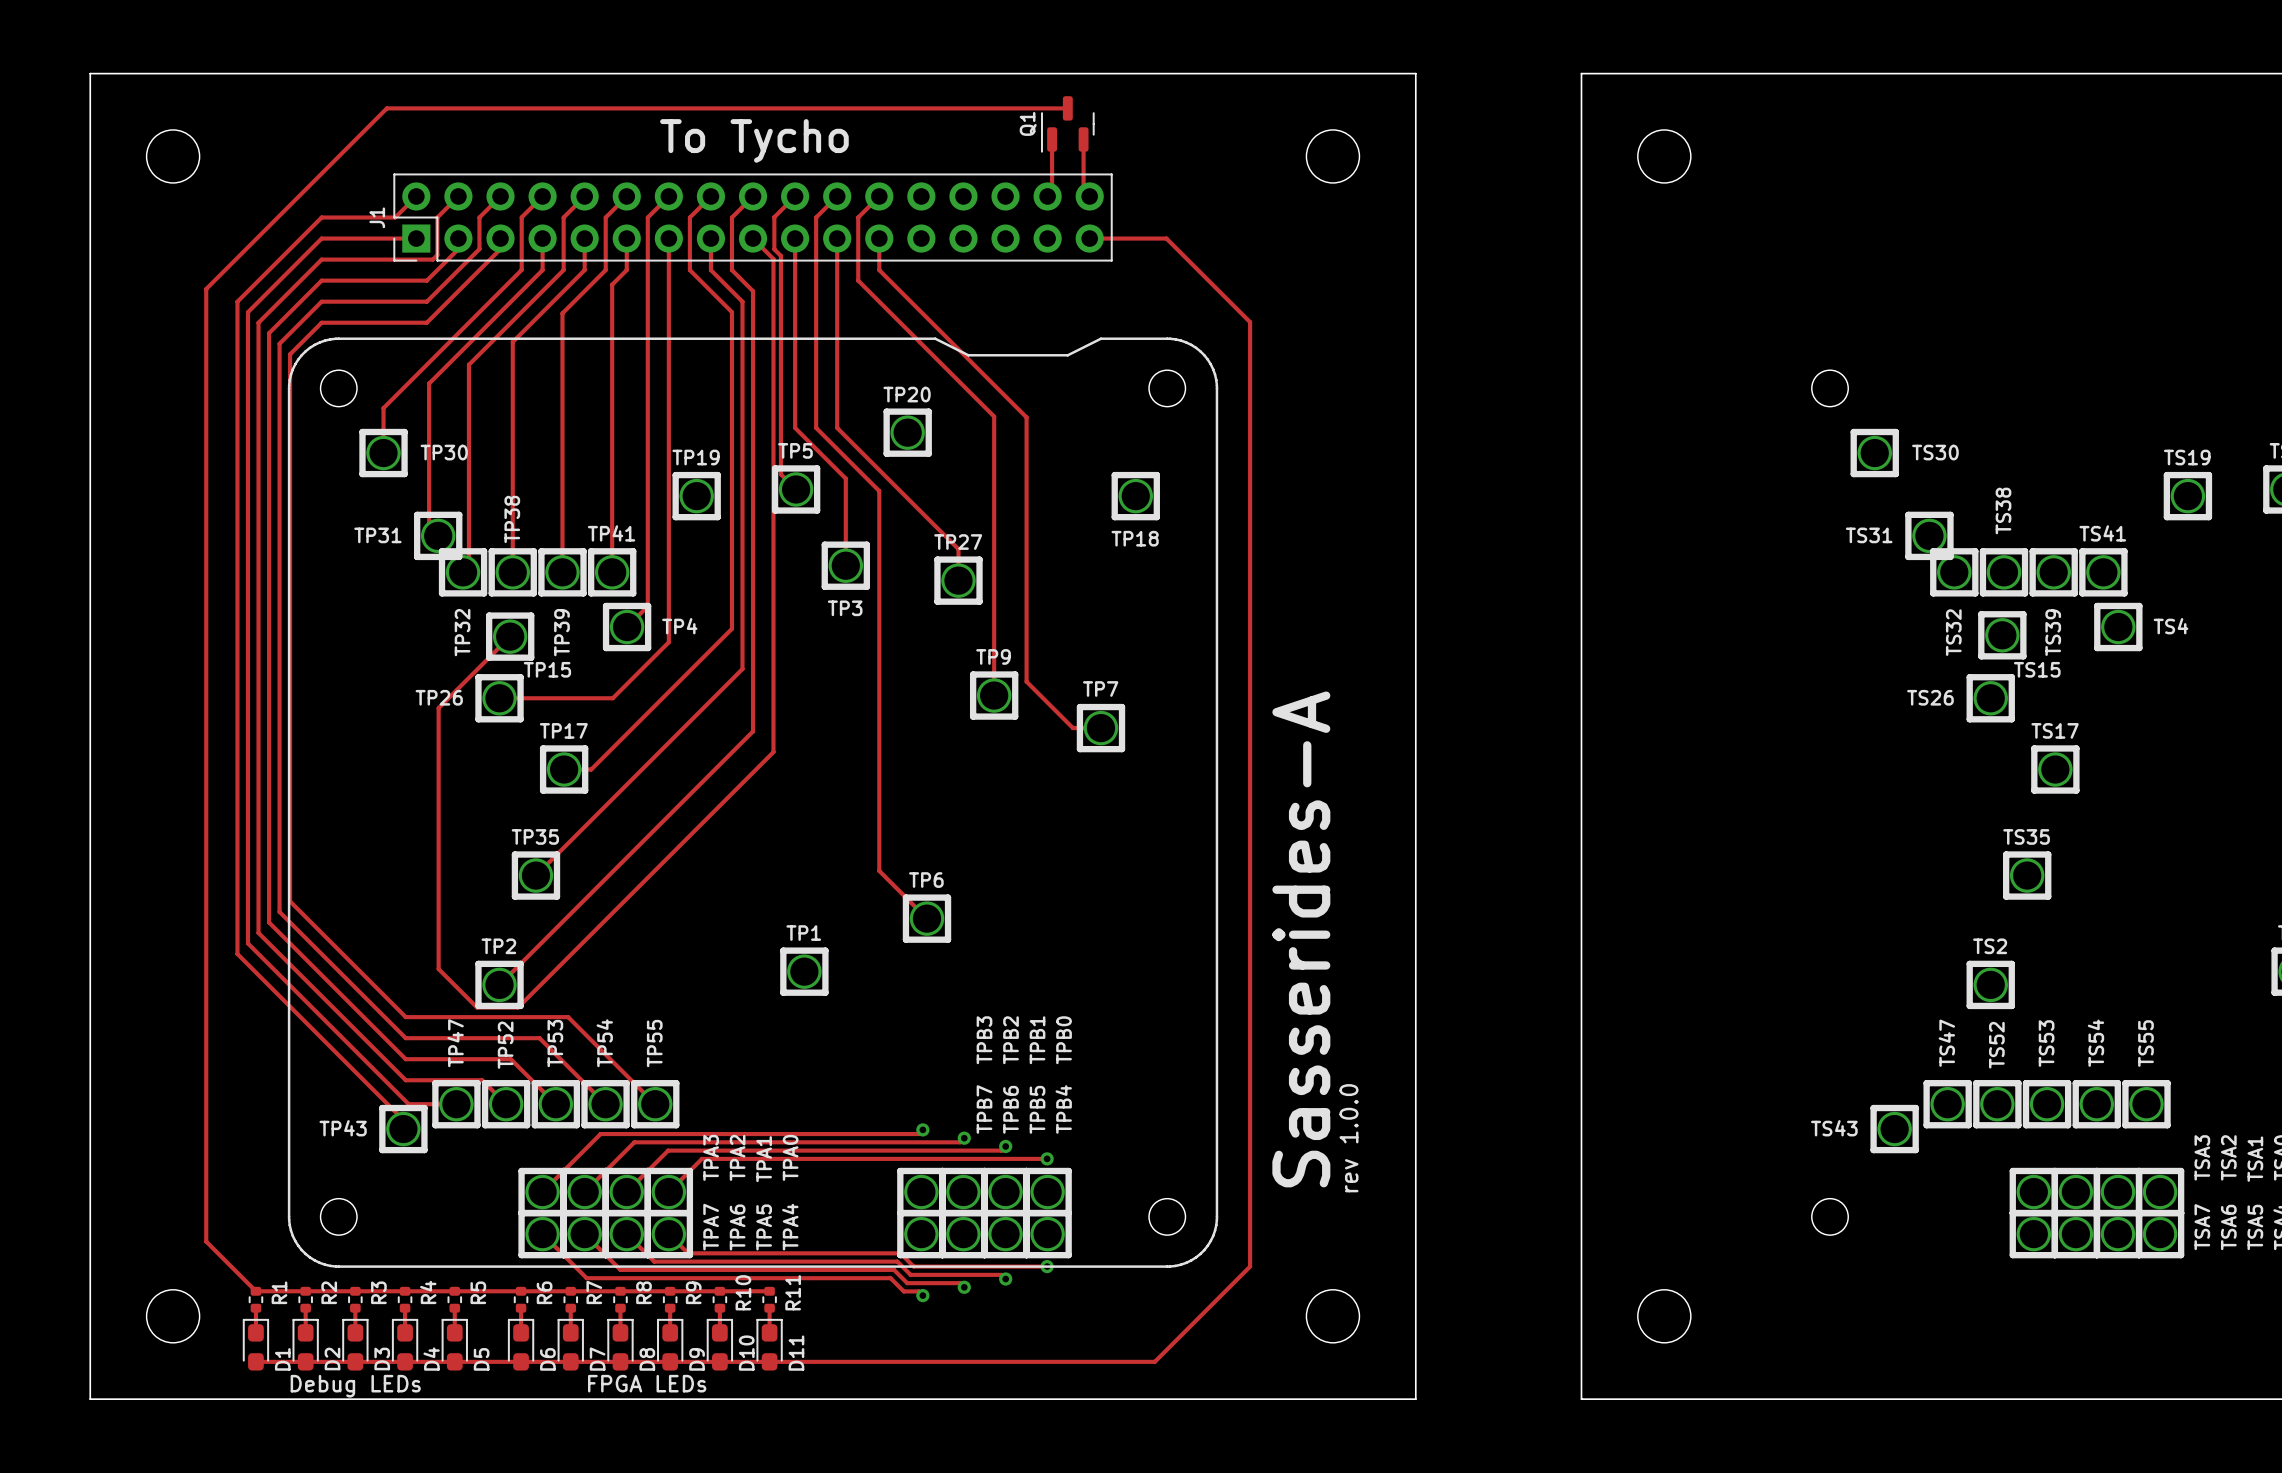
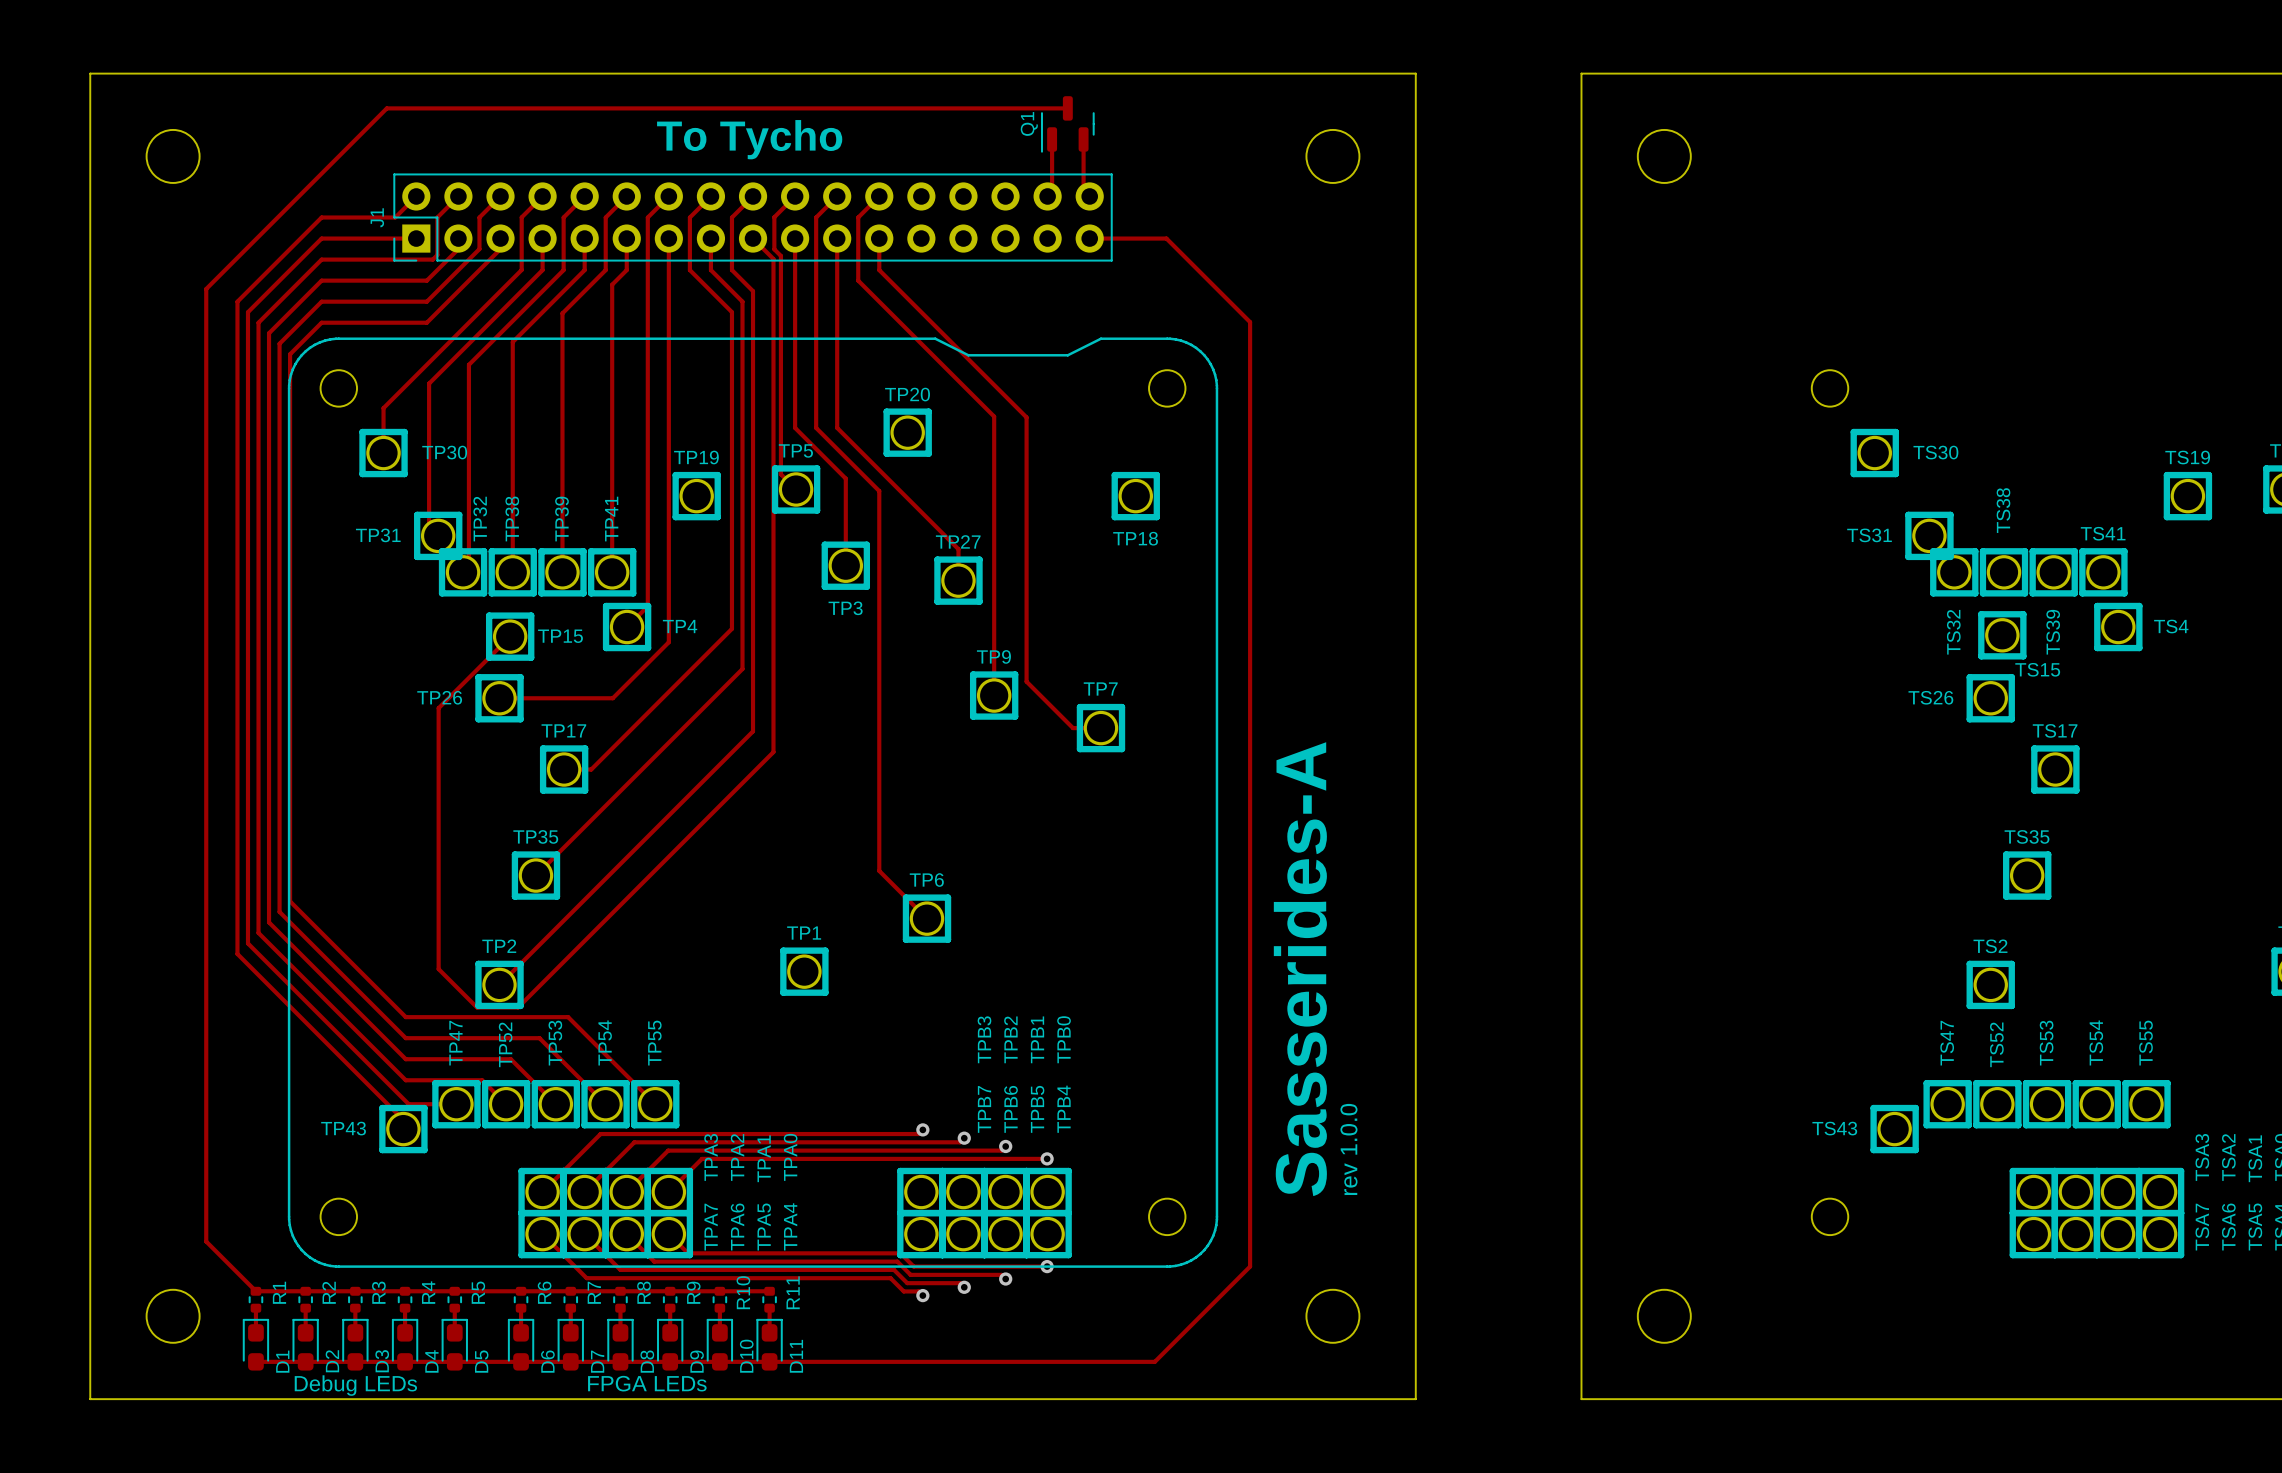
TP41 name rotation: 0° (611, 533) -> 90° counterclockwise (611, 519)
TP32 name position: TP32 (462, 632) -> TP32 (480, 519)
TP39 name position: TP39 (561, 632) -> TP39 (561, 519)
TP15 name position: TP15 (547, 669) -> TP15 (560, 636)

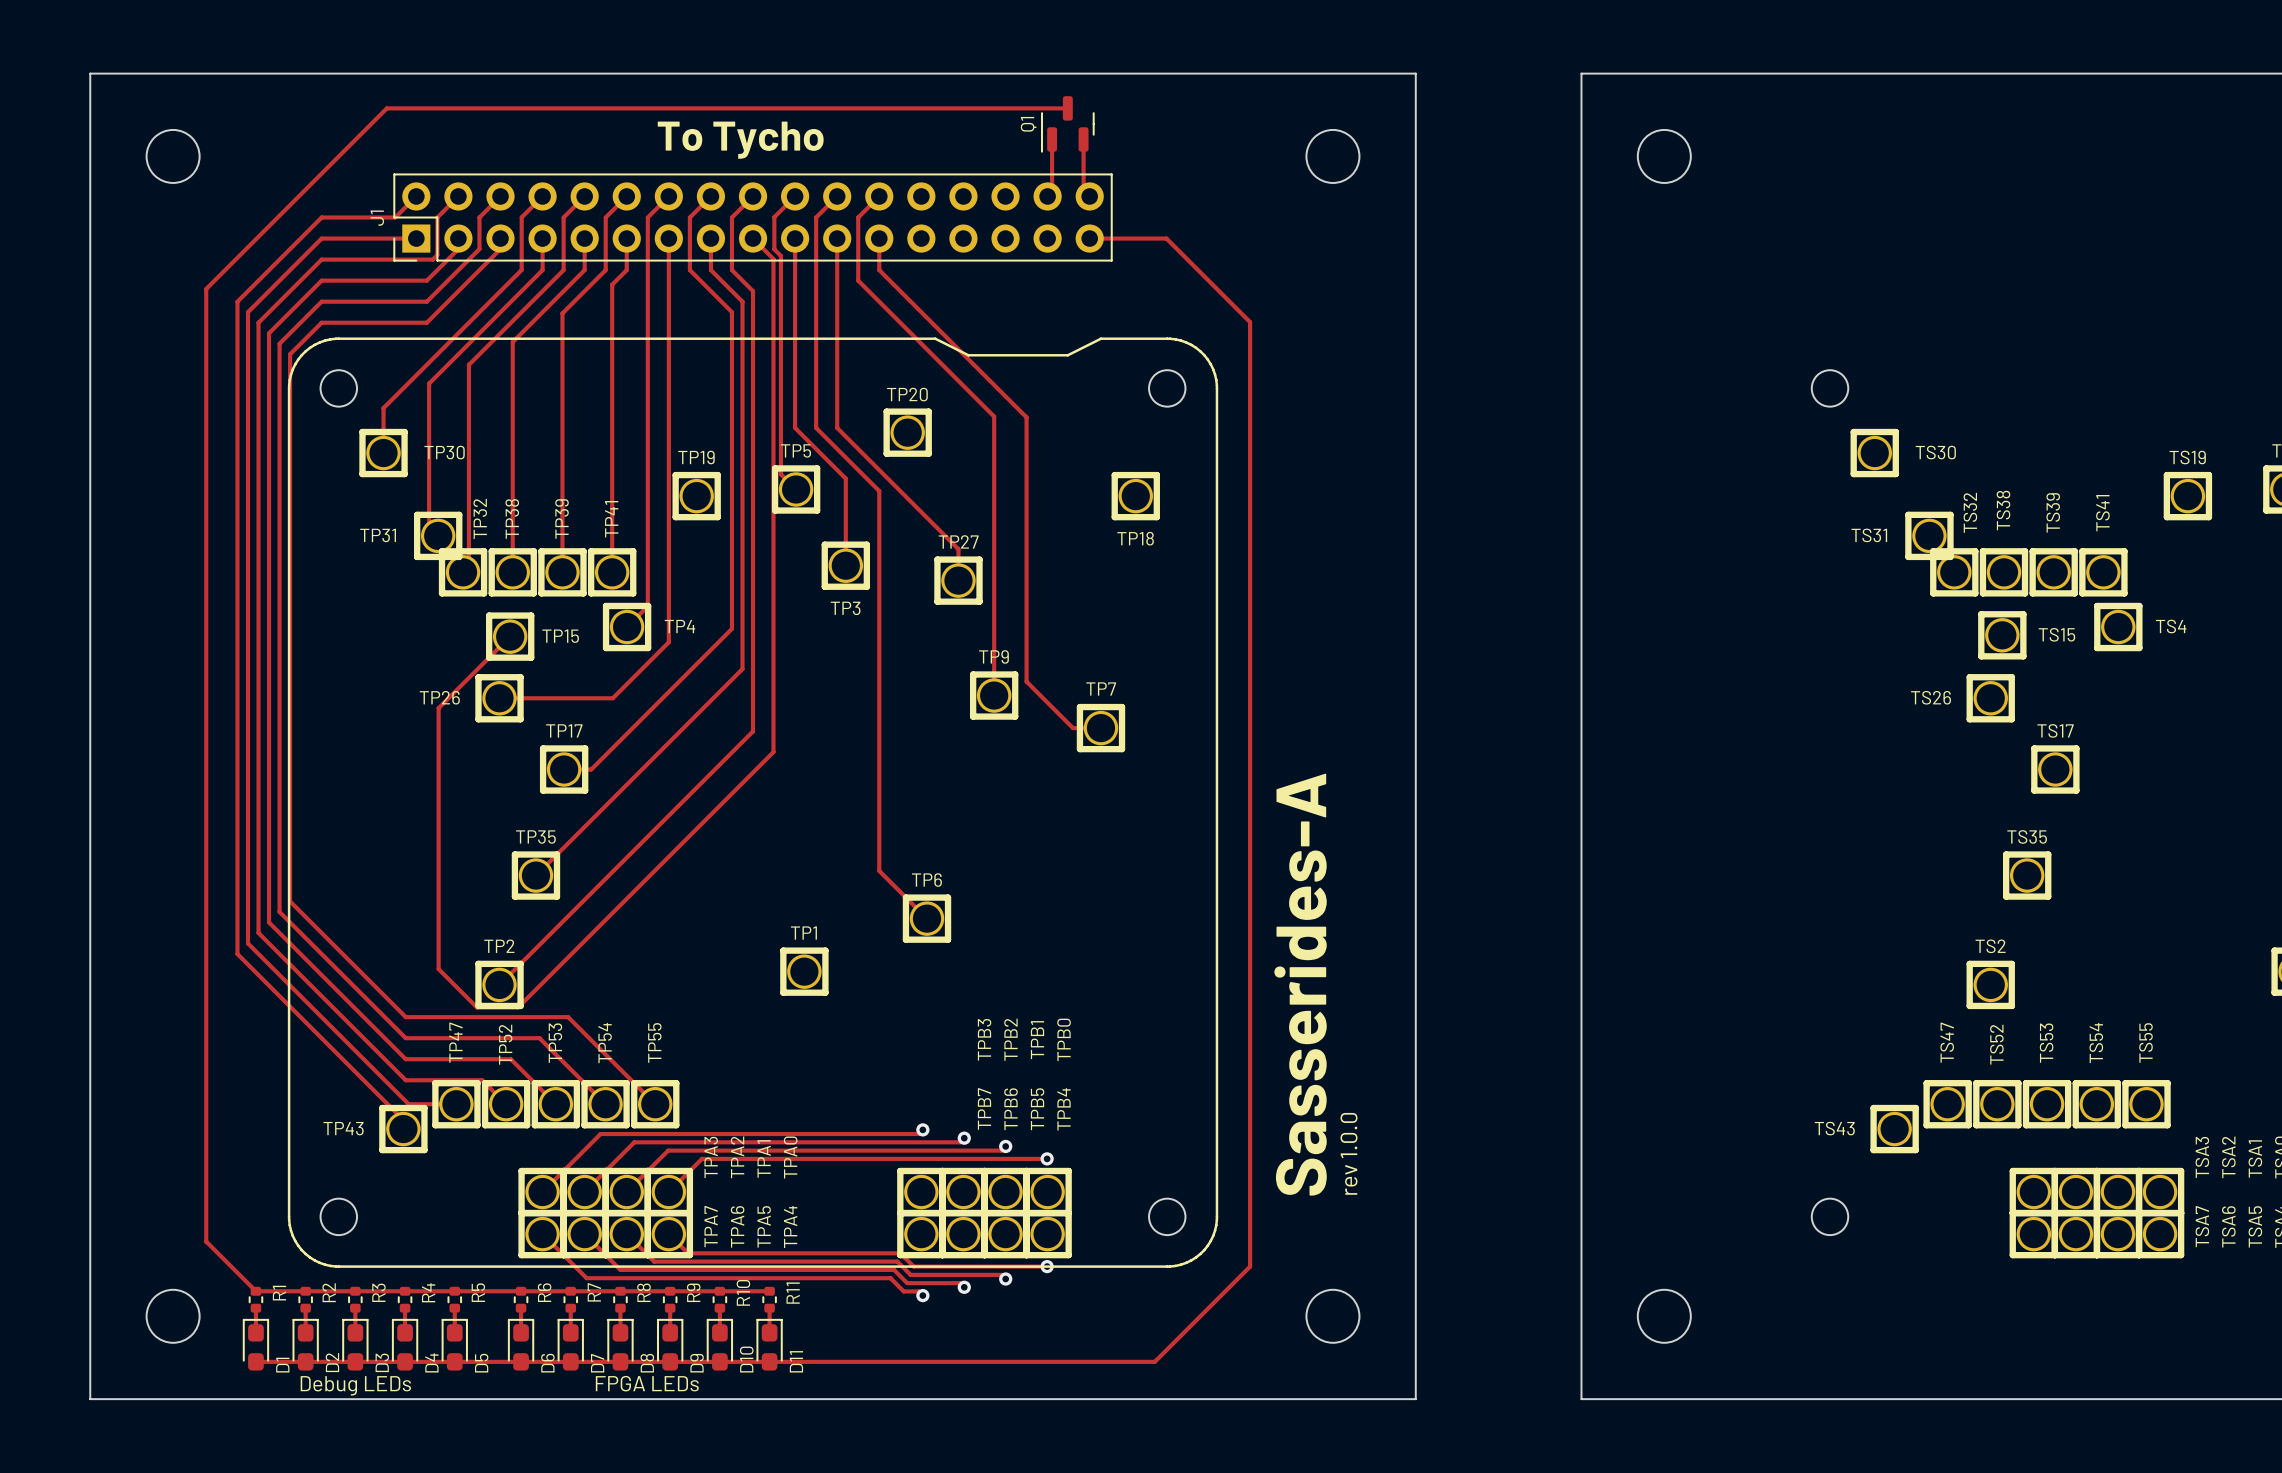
TS41 name rotation: 0° (2103, 533) -> 90° counterclockwise (2102, 513)
TS32 name position: TS32 (1953, 632) -> TS32 (1970, 512)
TS39 name position: TS39 (2053, 632) -> TS39 (2053, 512)
TS15 name position: TS15 (2037, 669) -> TS15 (2056, 634)

